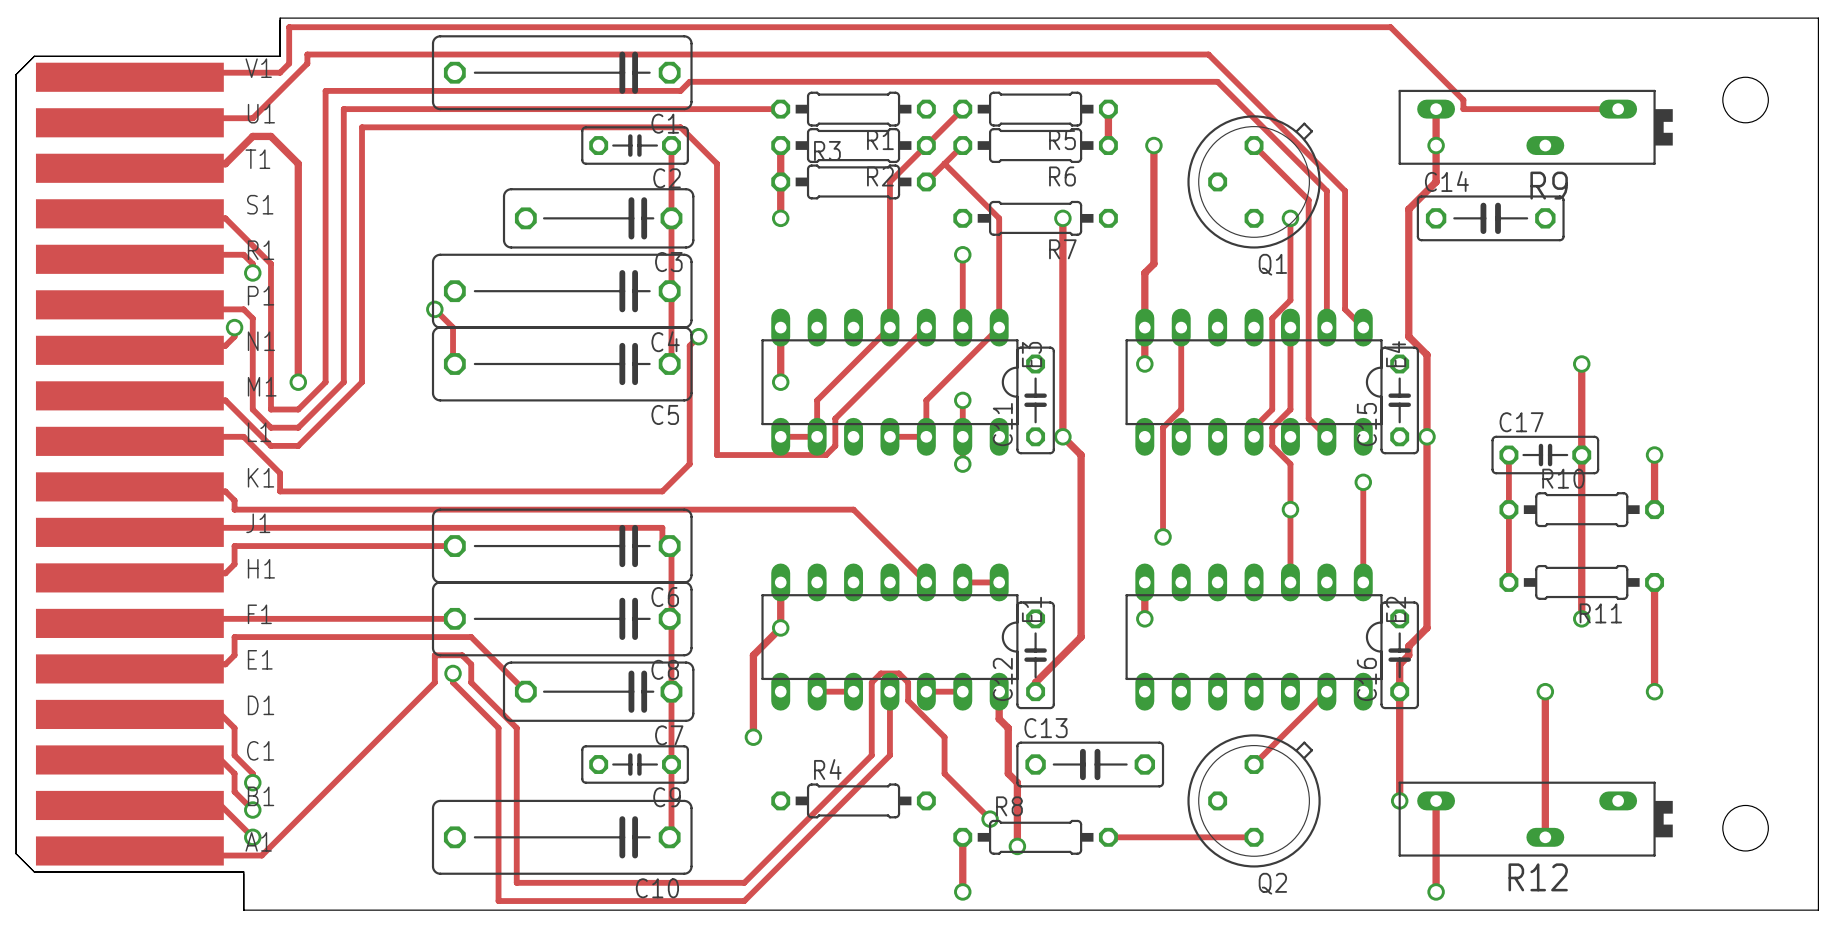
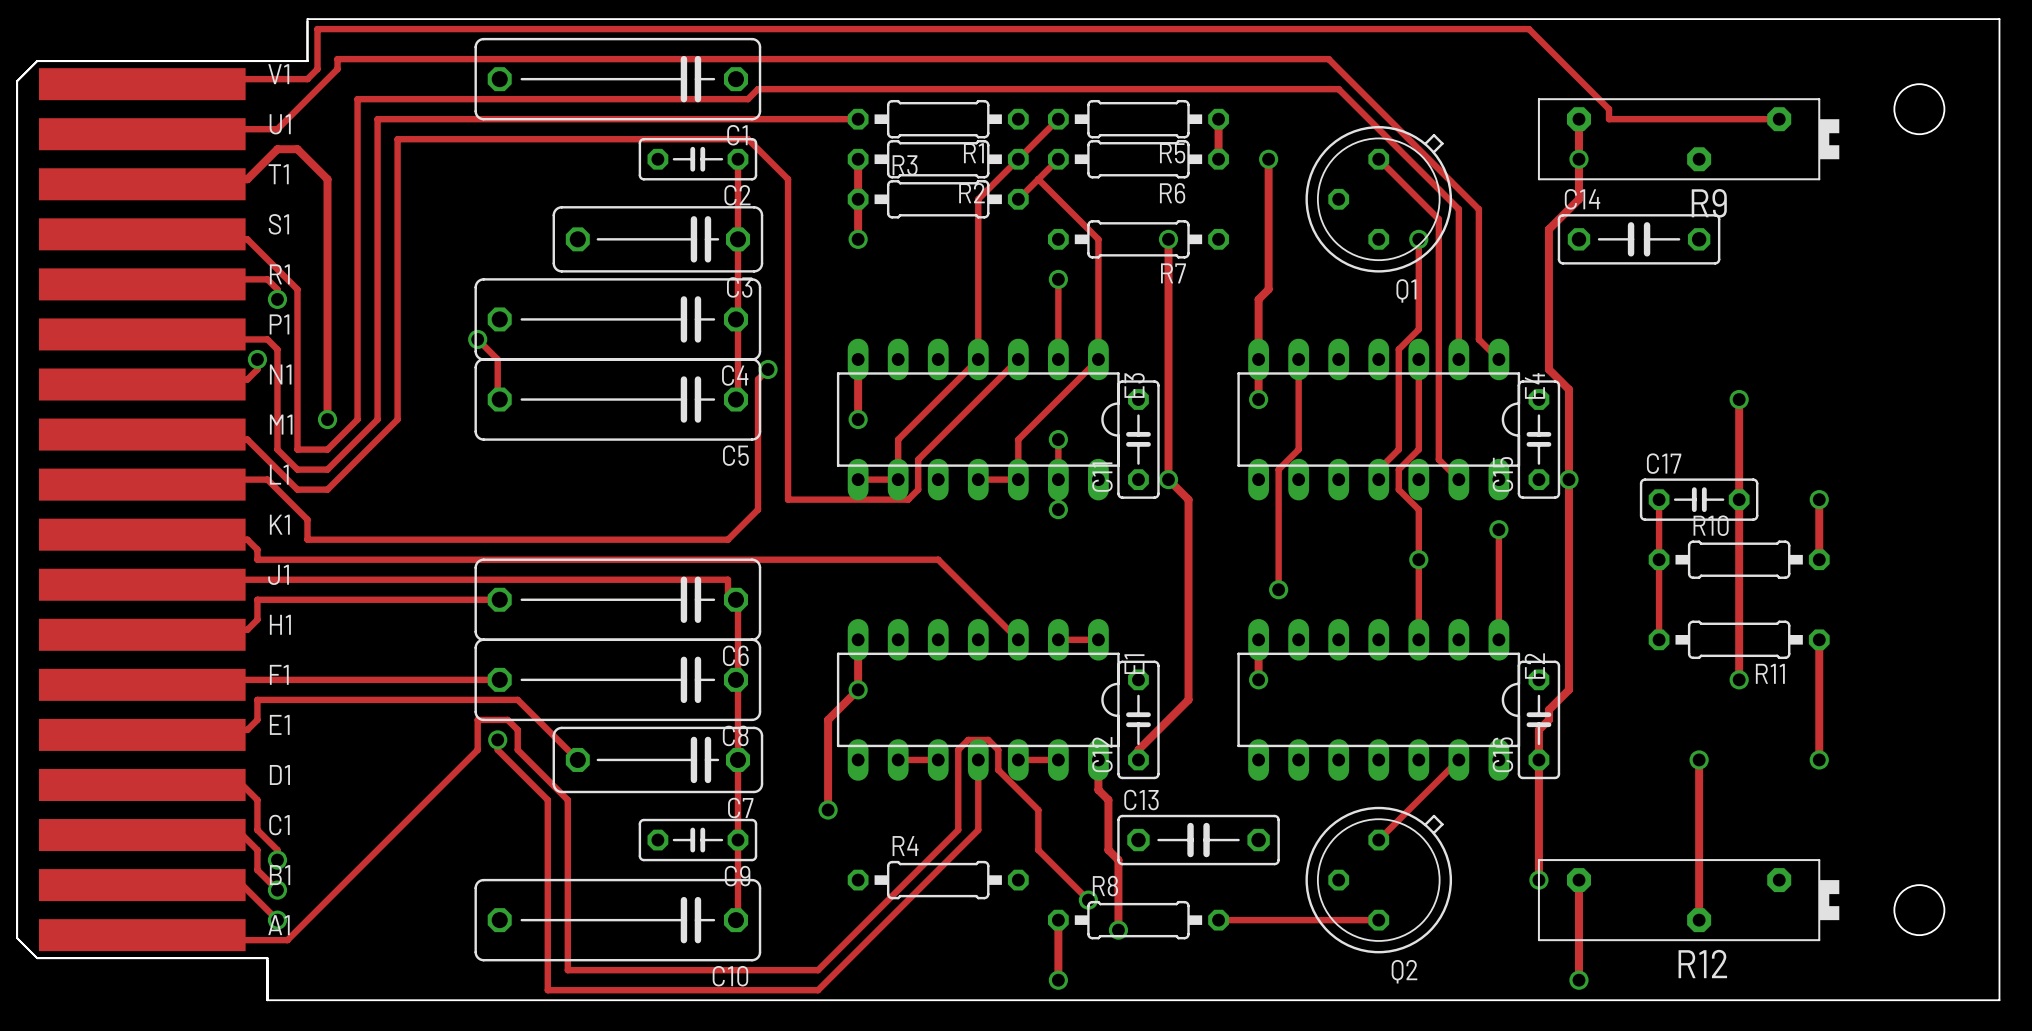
R9 footprint: [1398, 89, 1673, 165] -> [1537, 98, 1840, 181]
R12 footprint: [1398, 781, 1673, 857] -> [1537, 859, 1840, 942]

